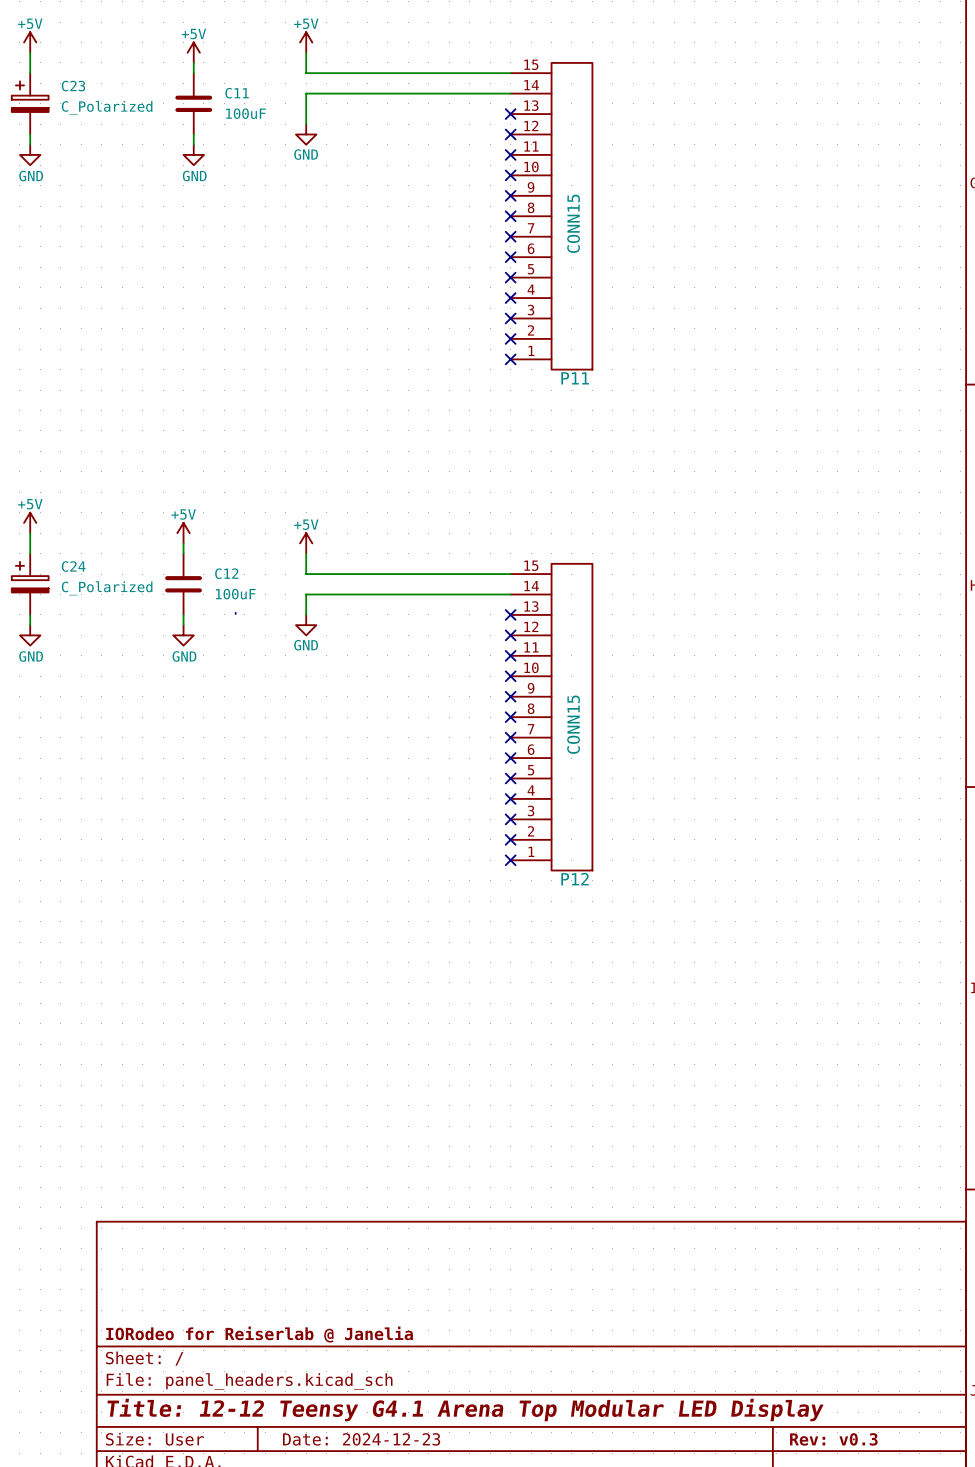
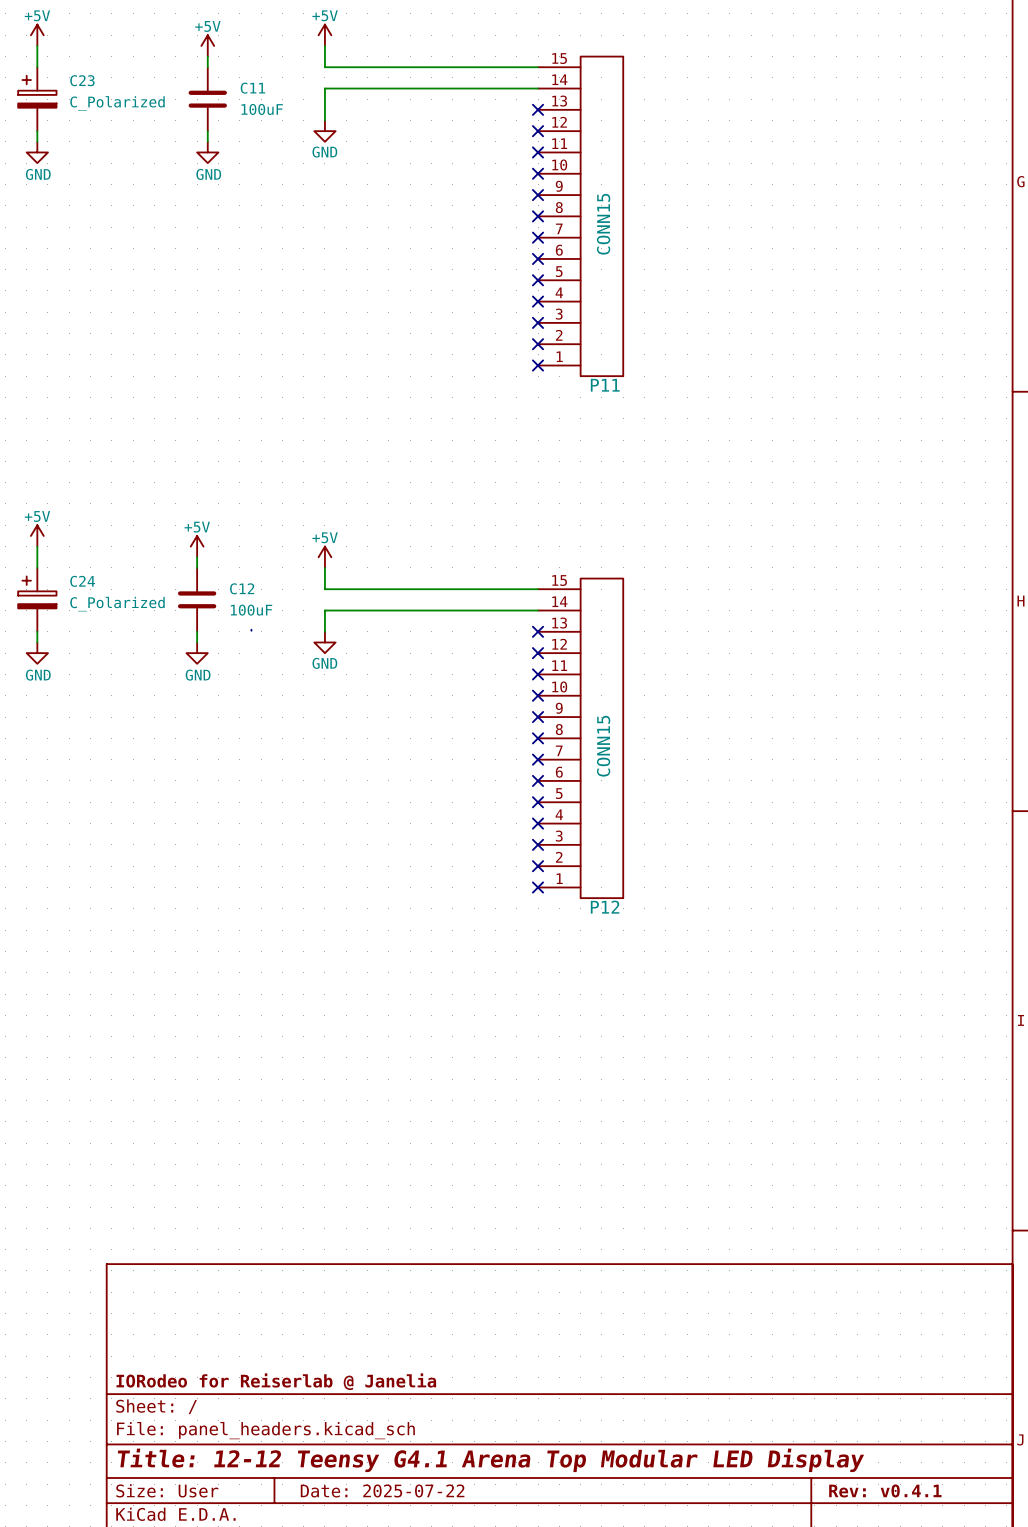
title block: Date: 2024-12-23 (361, 1439) -> Date: 2025-07-22 (382, 1490)
title block: Rev: v0.3 (833, 1439) -> Rev: v0.4.1 (885, 1490)

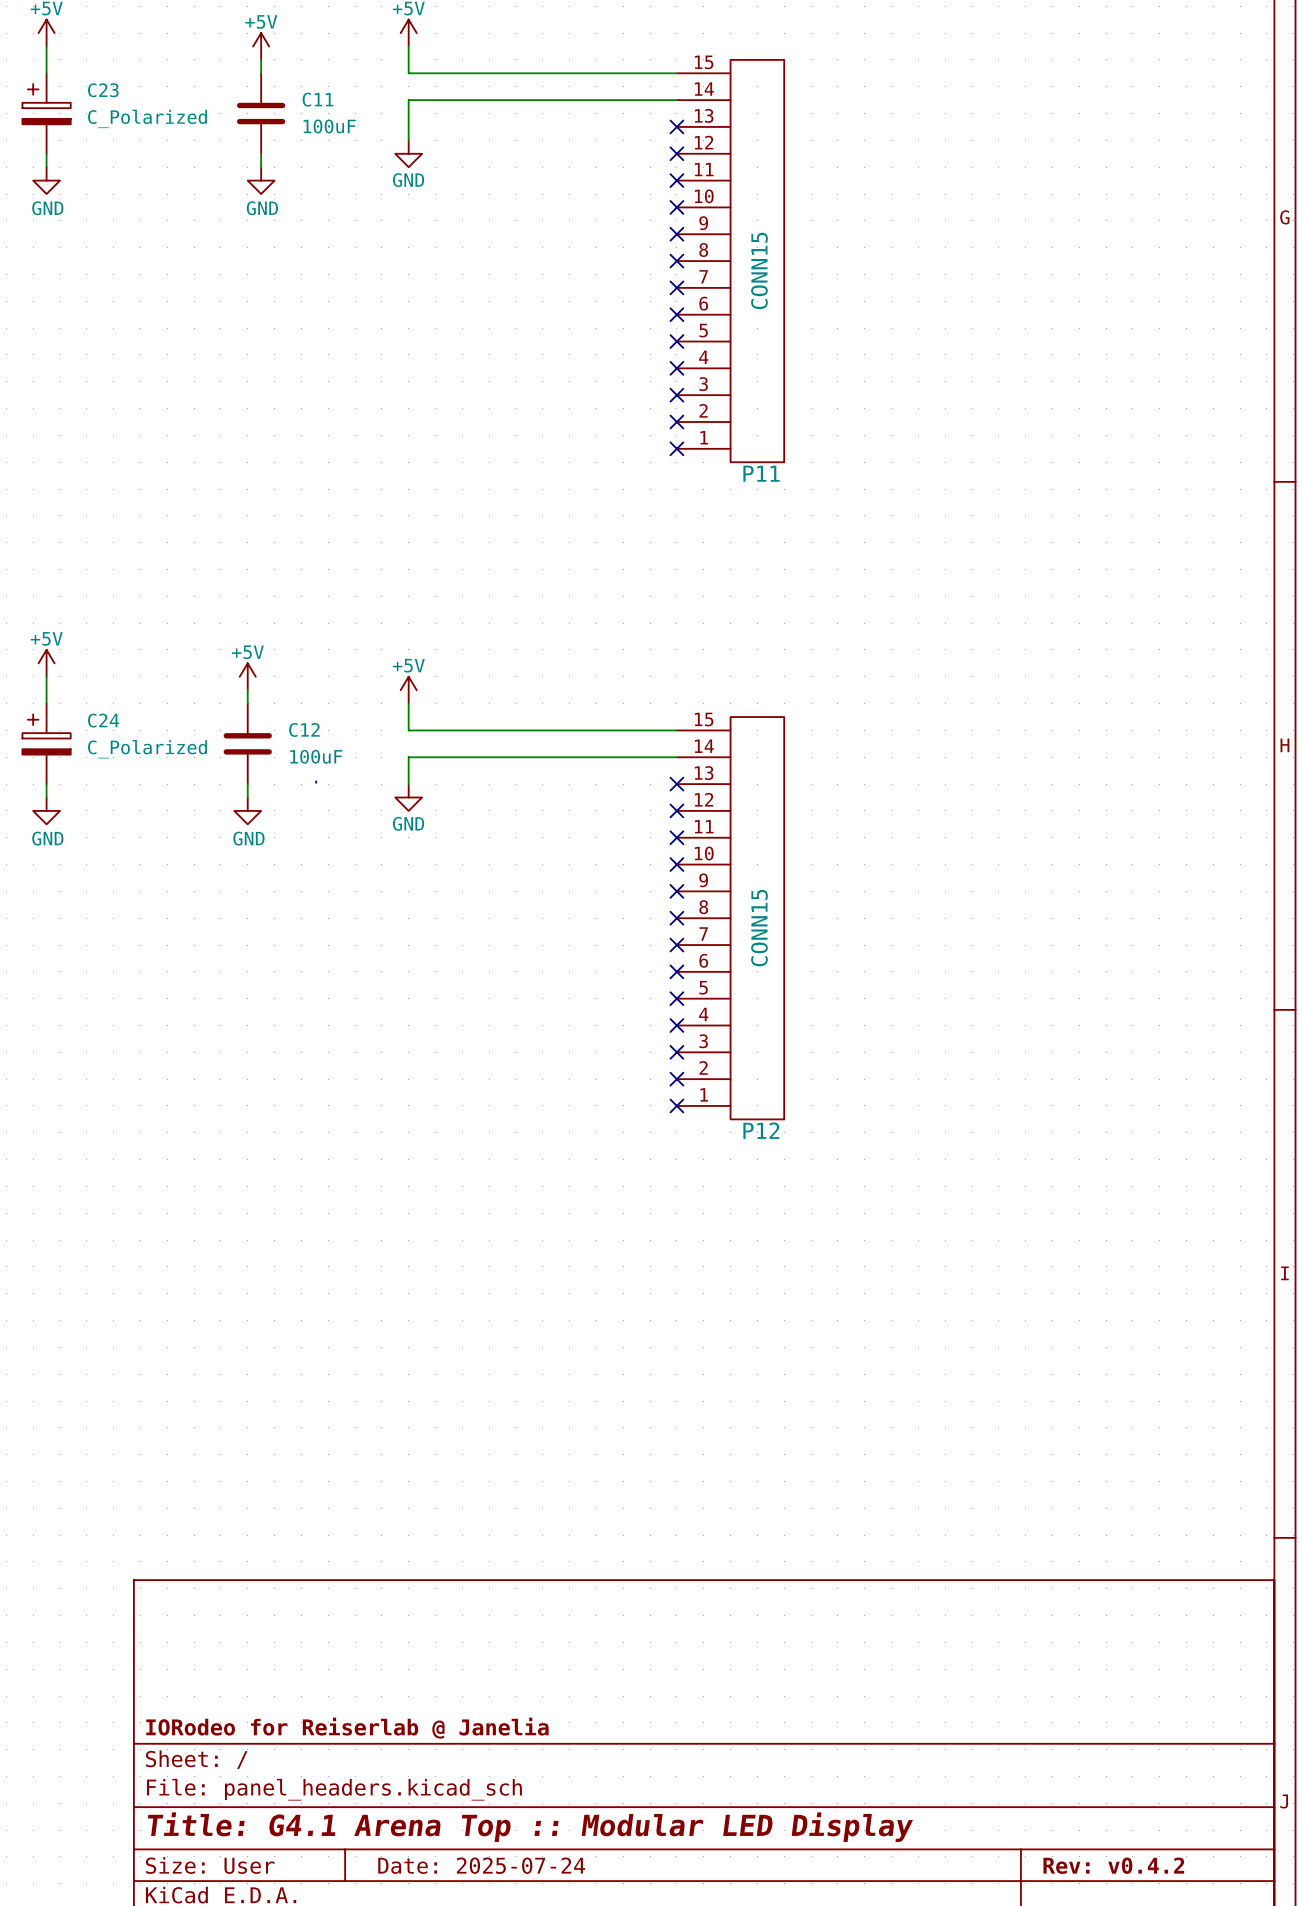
title block: Title: 12-12 Teensy G4.1 Arena Top Modular LED Display (490, 1460) -> Title: G4.1 Arena Top :: Modular LED Display (530, 1827)
title block: Date: 2025-07-22 (382, 1490) -> Date: 2025-07-24 (481, 1865)
title block: Rev: v0.4.1 (885, 1490) -> Rev: v0.4.2 (1113, 1865)

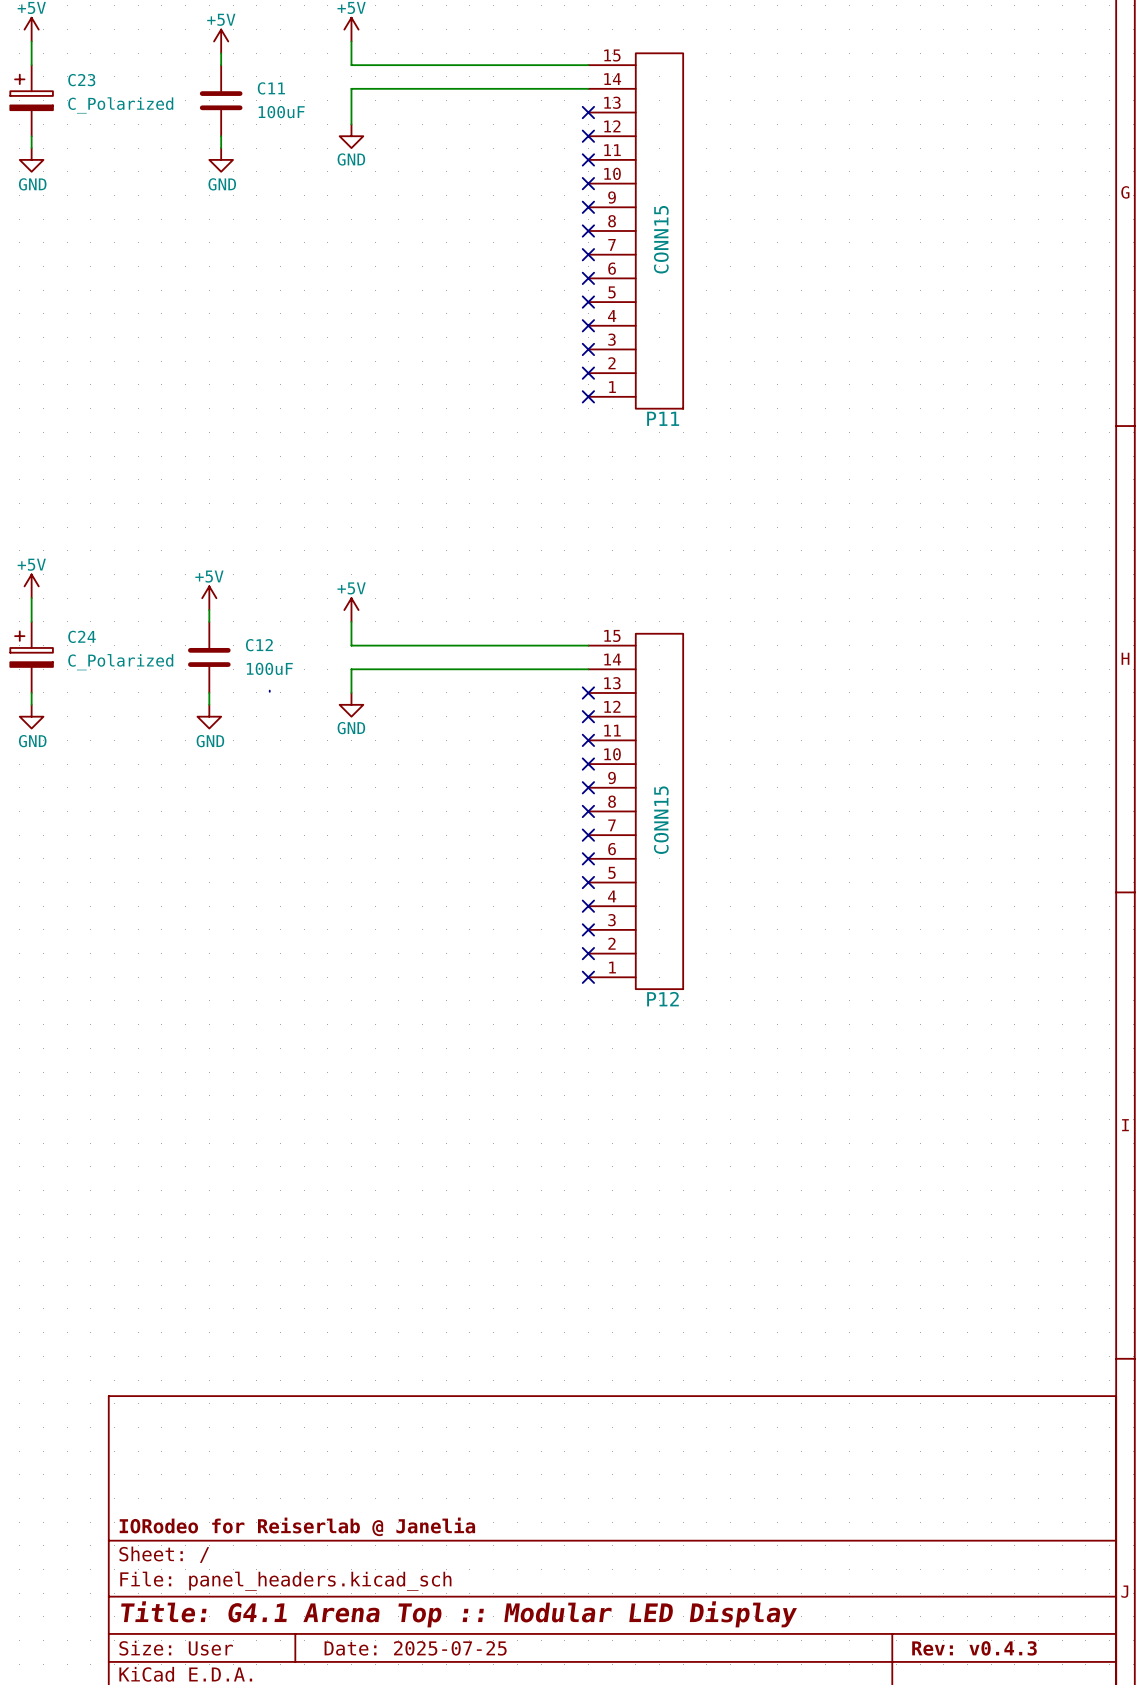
title block: Date: 2025-07-24 (481, 1865) -> Date: 2025-07-25 (415, 1648)
title block: Rev: v0.4.2 (1113, 1865) -> Rev: v0.4.3 (974, 1648)

